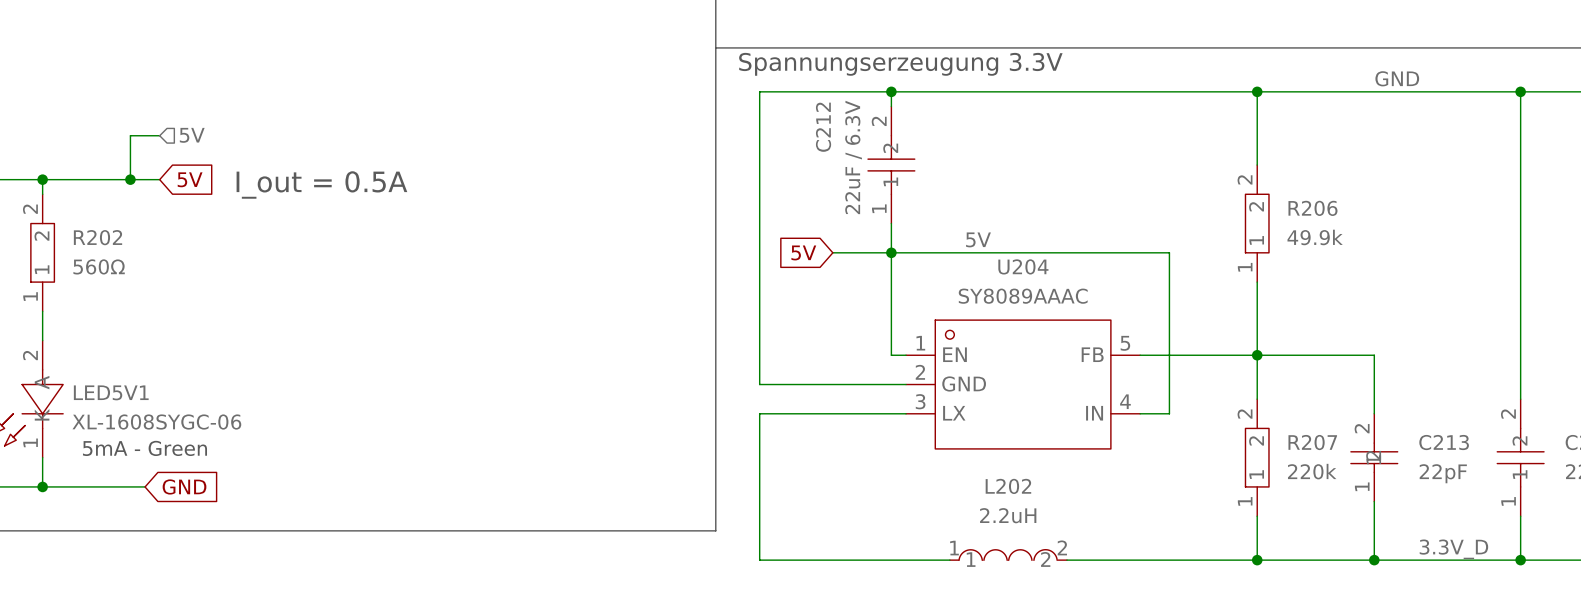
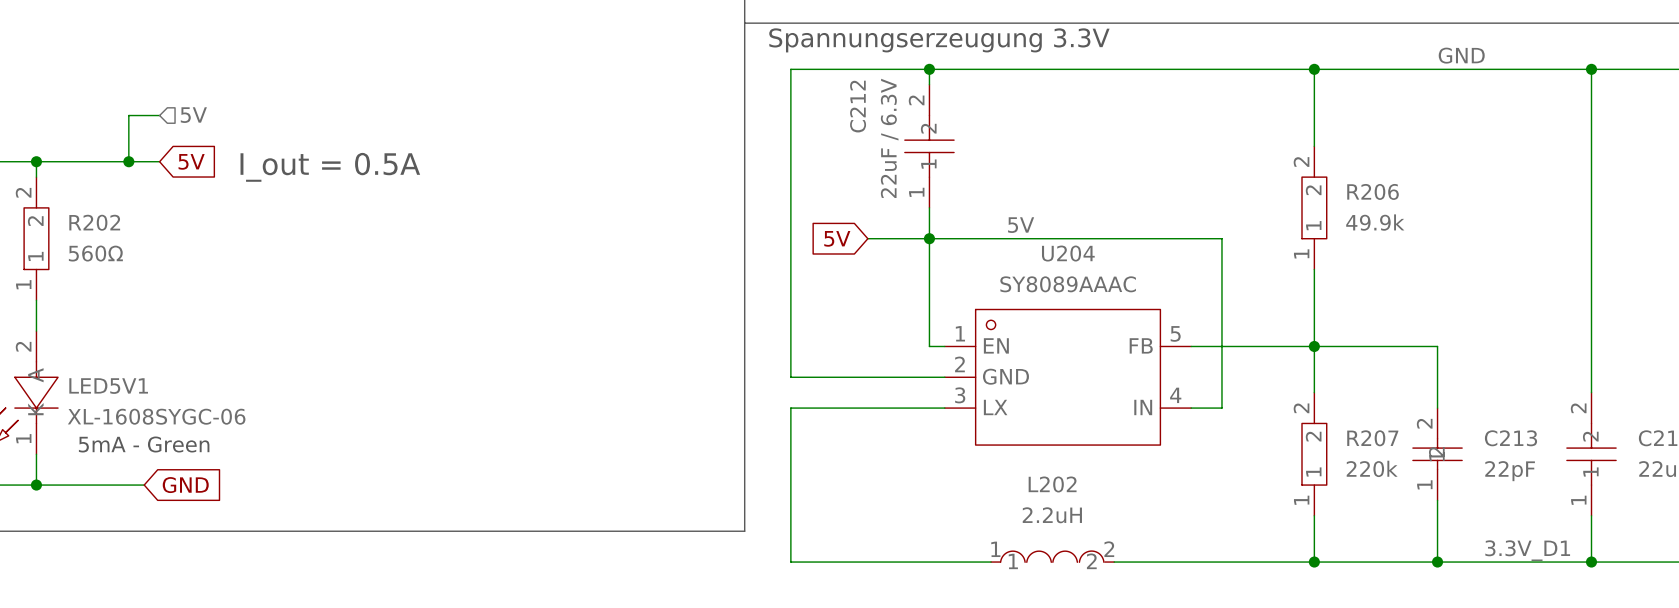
label: 3.3V_D (1453, 549) -> 3.3V_D1 (1527, 550)

